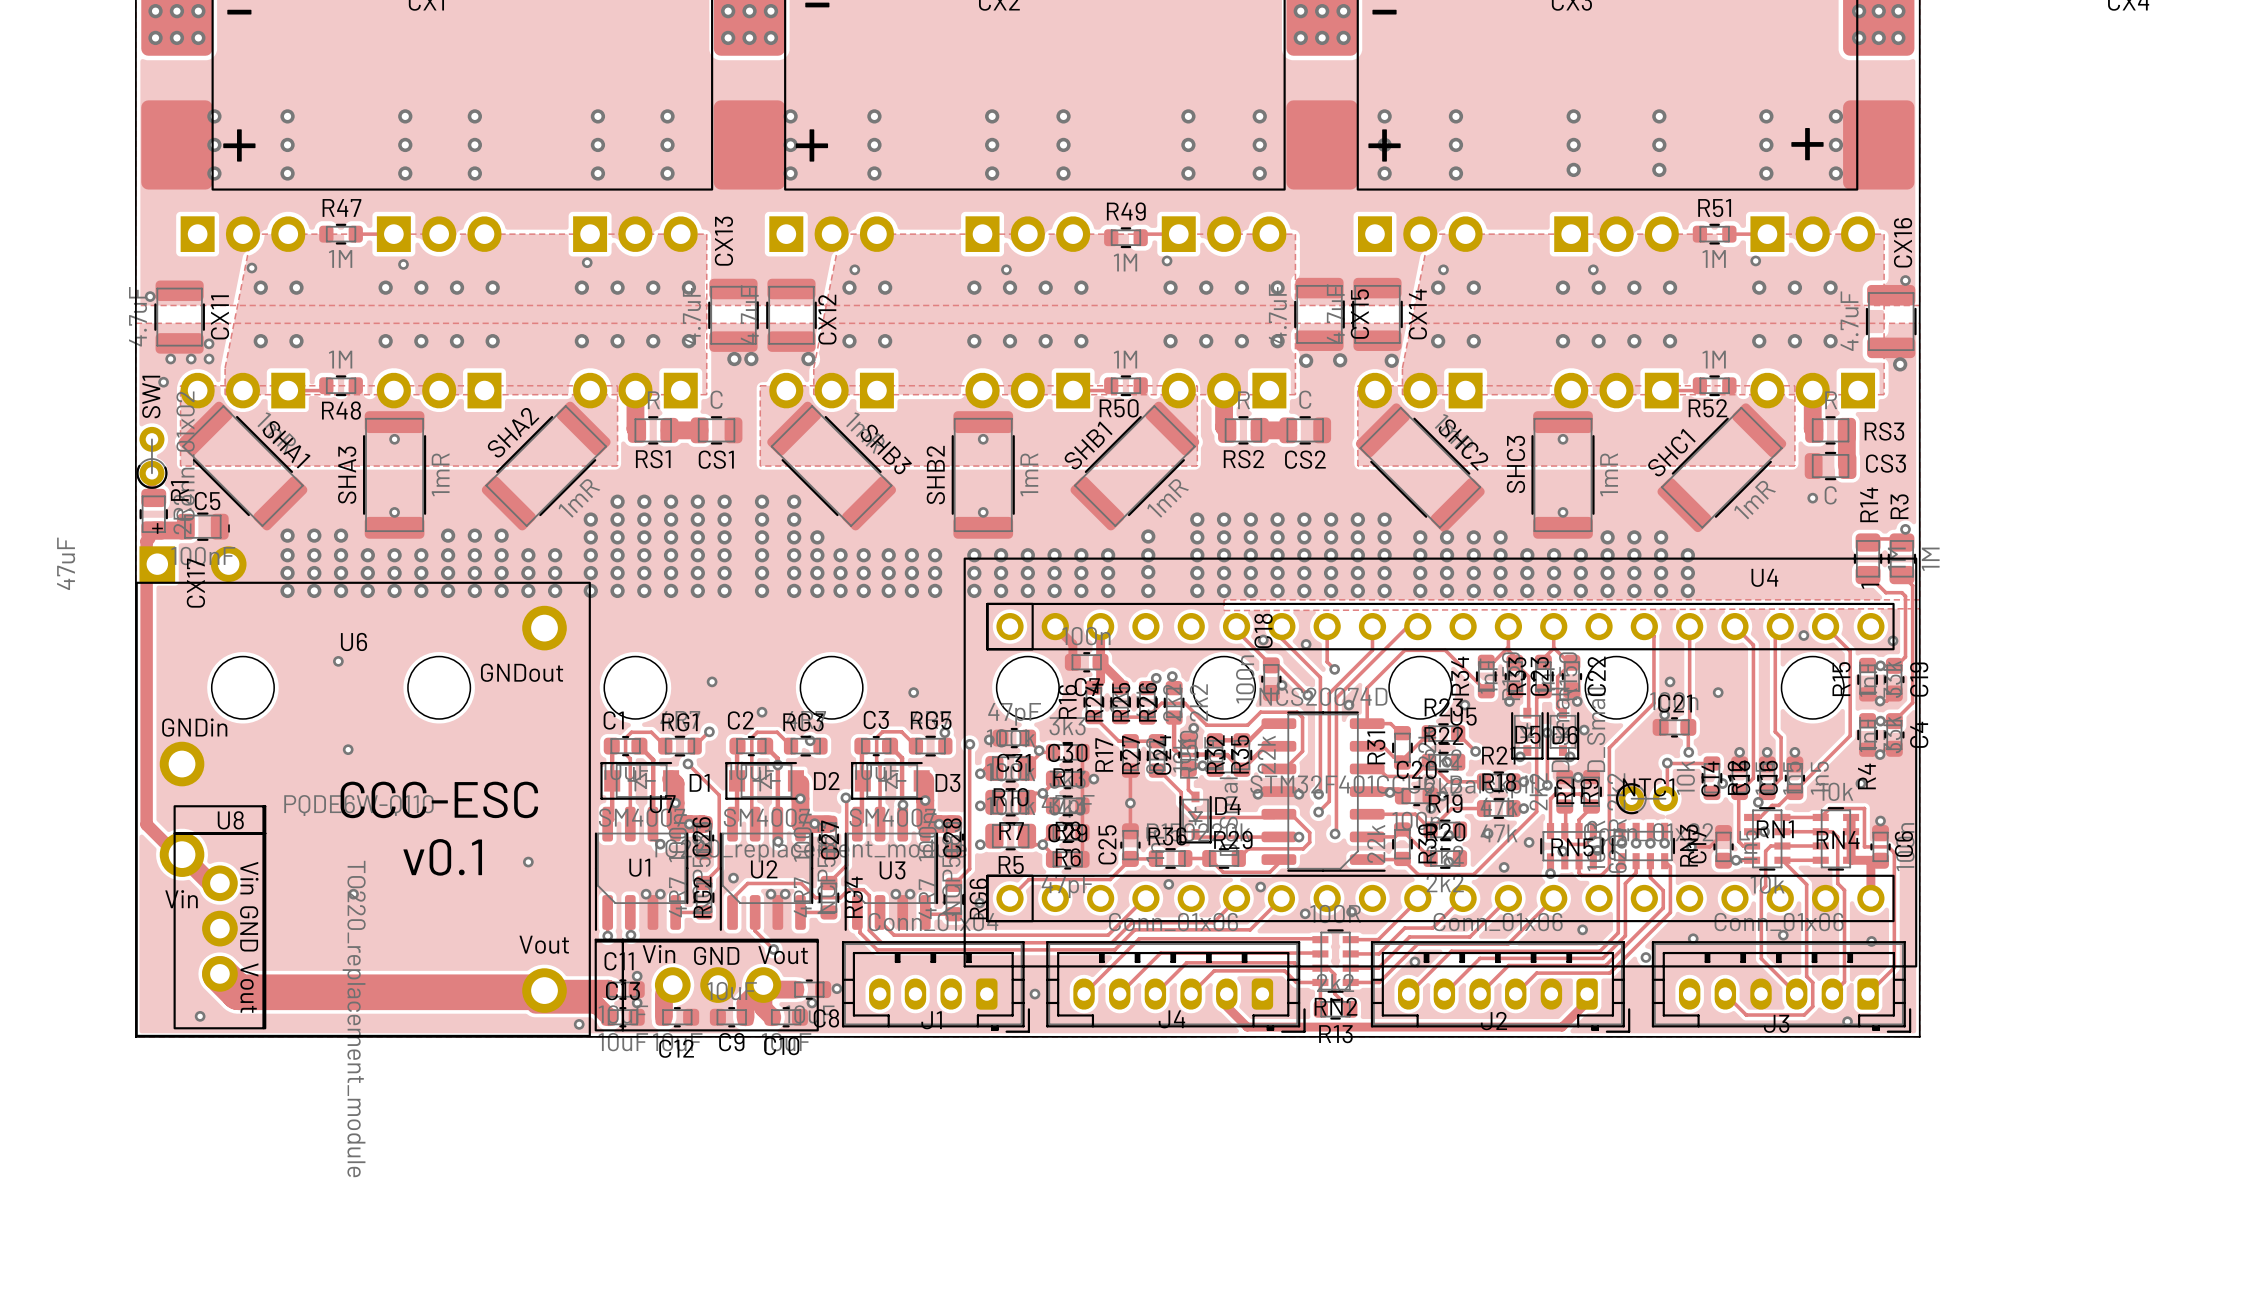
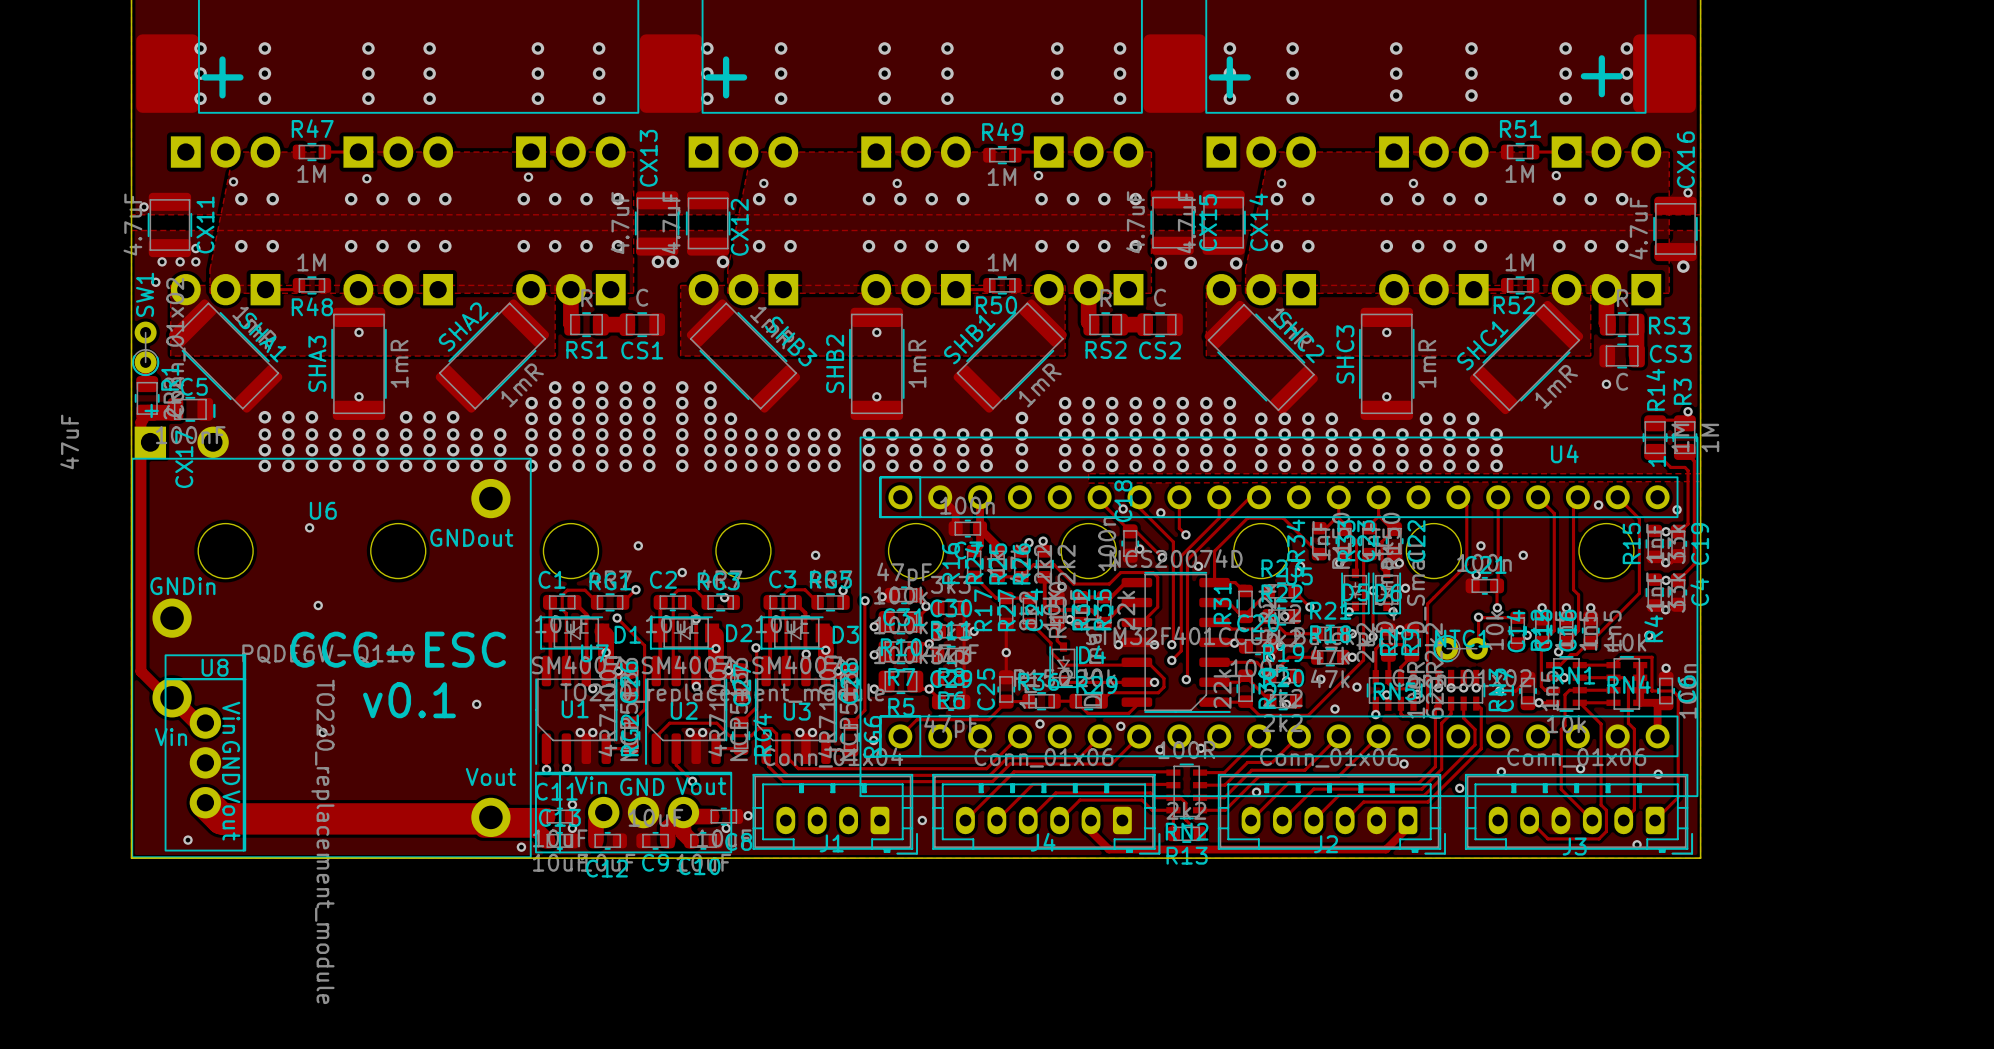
via: (733, 878) -> none

